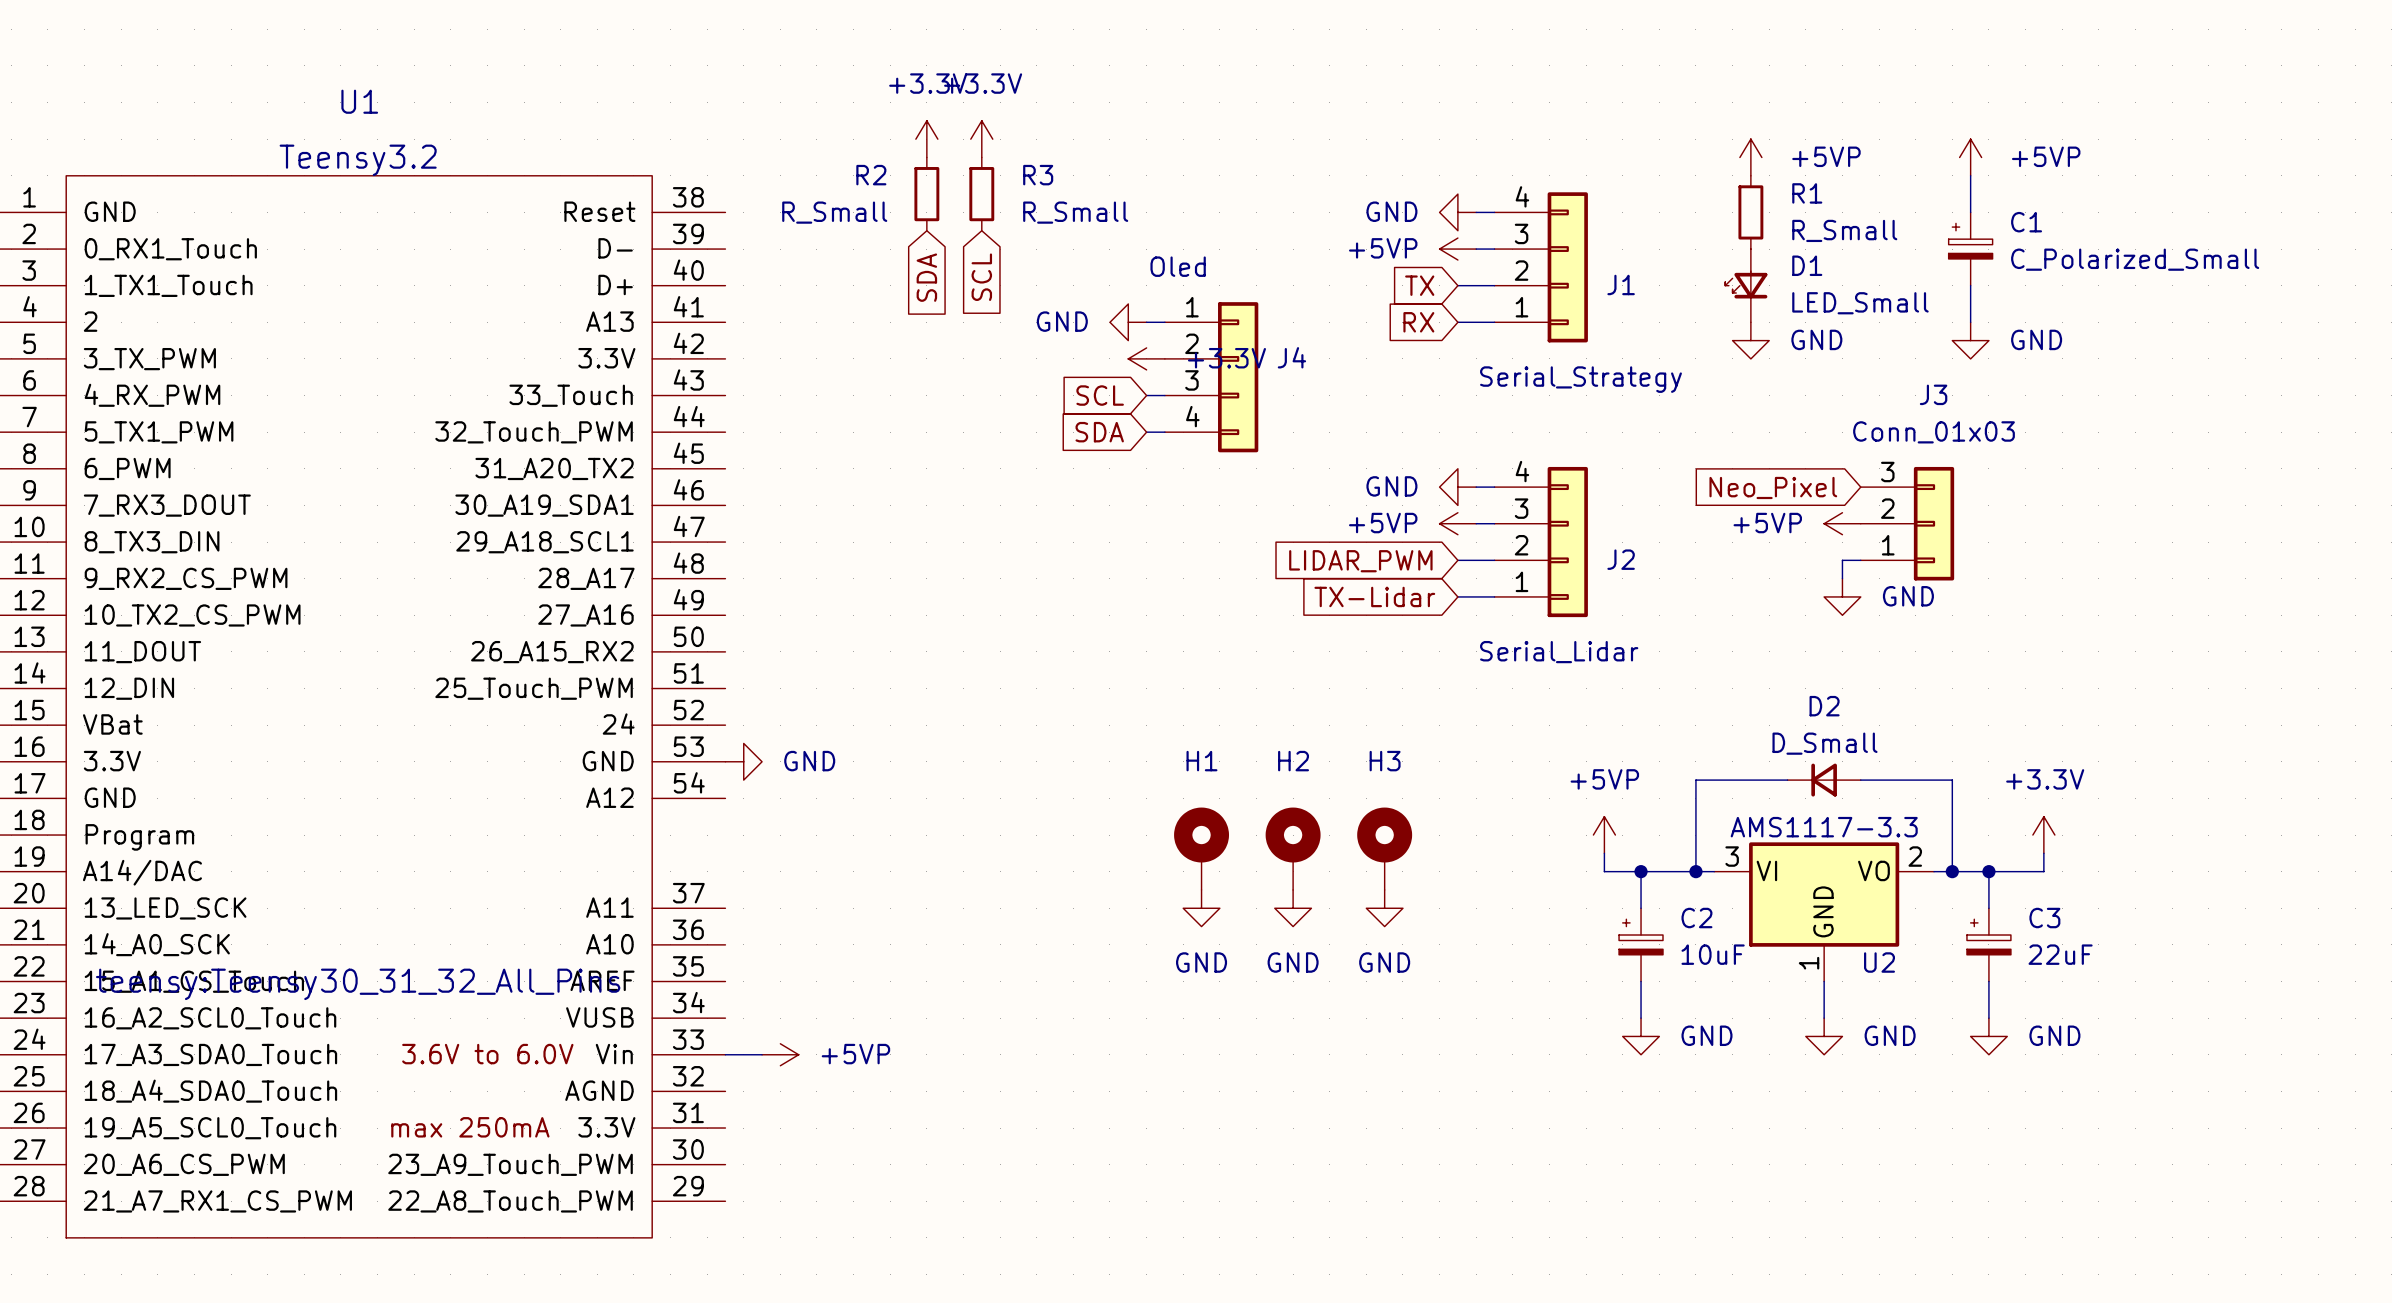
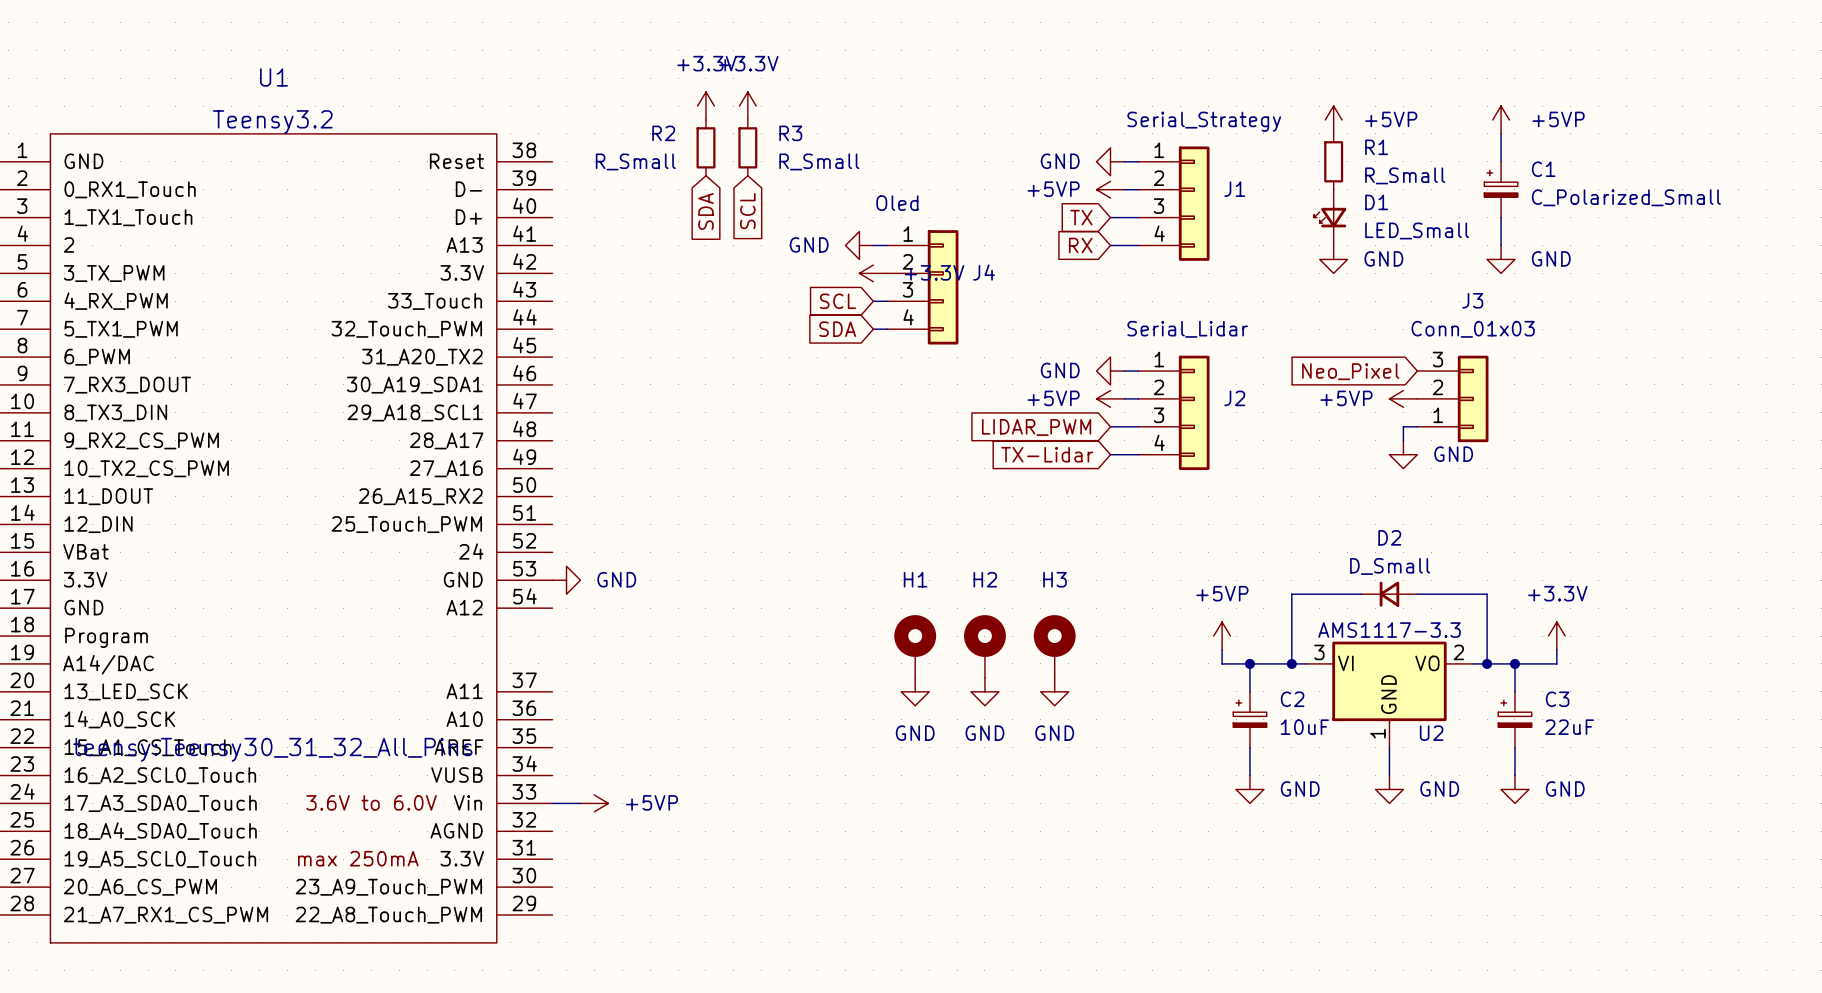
J1 flip: as is (1567, 267) -> up-down (1194, 203)
J2 flip: as is (1567, 542) -> up-down (1194, 412)

